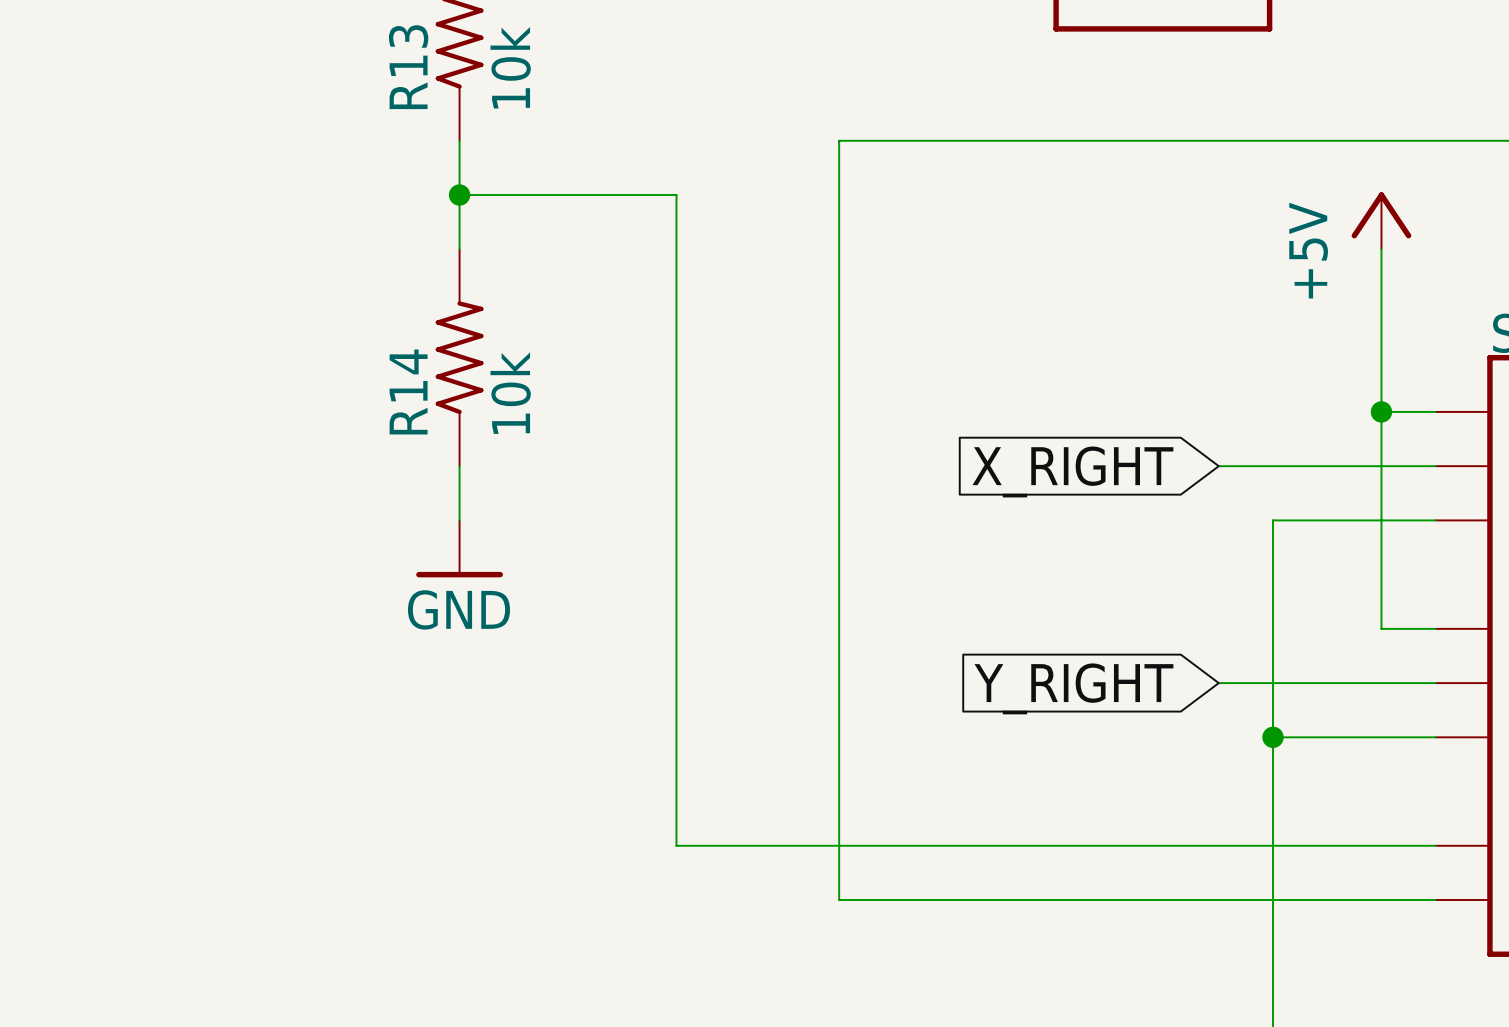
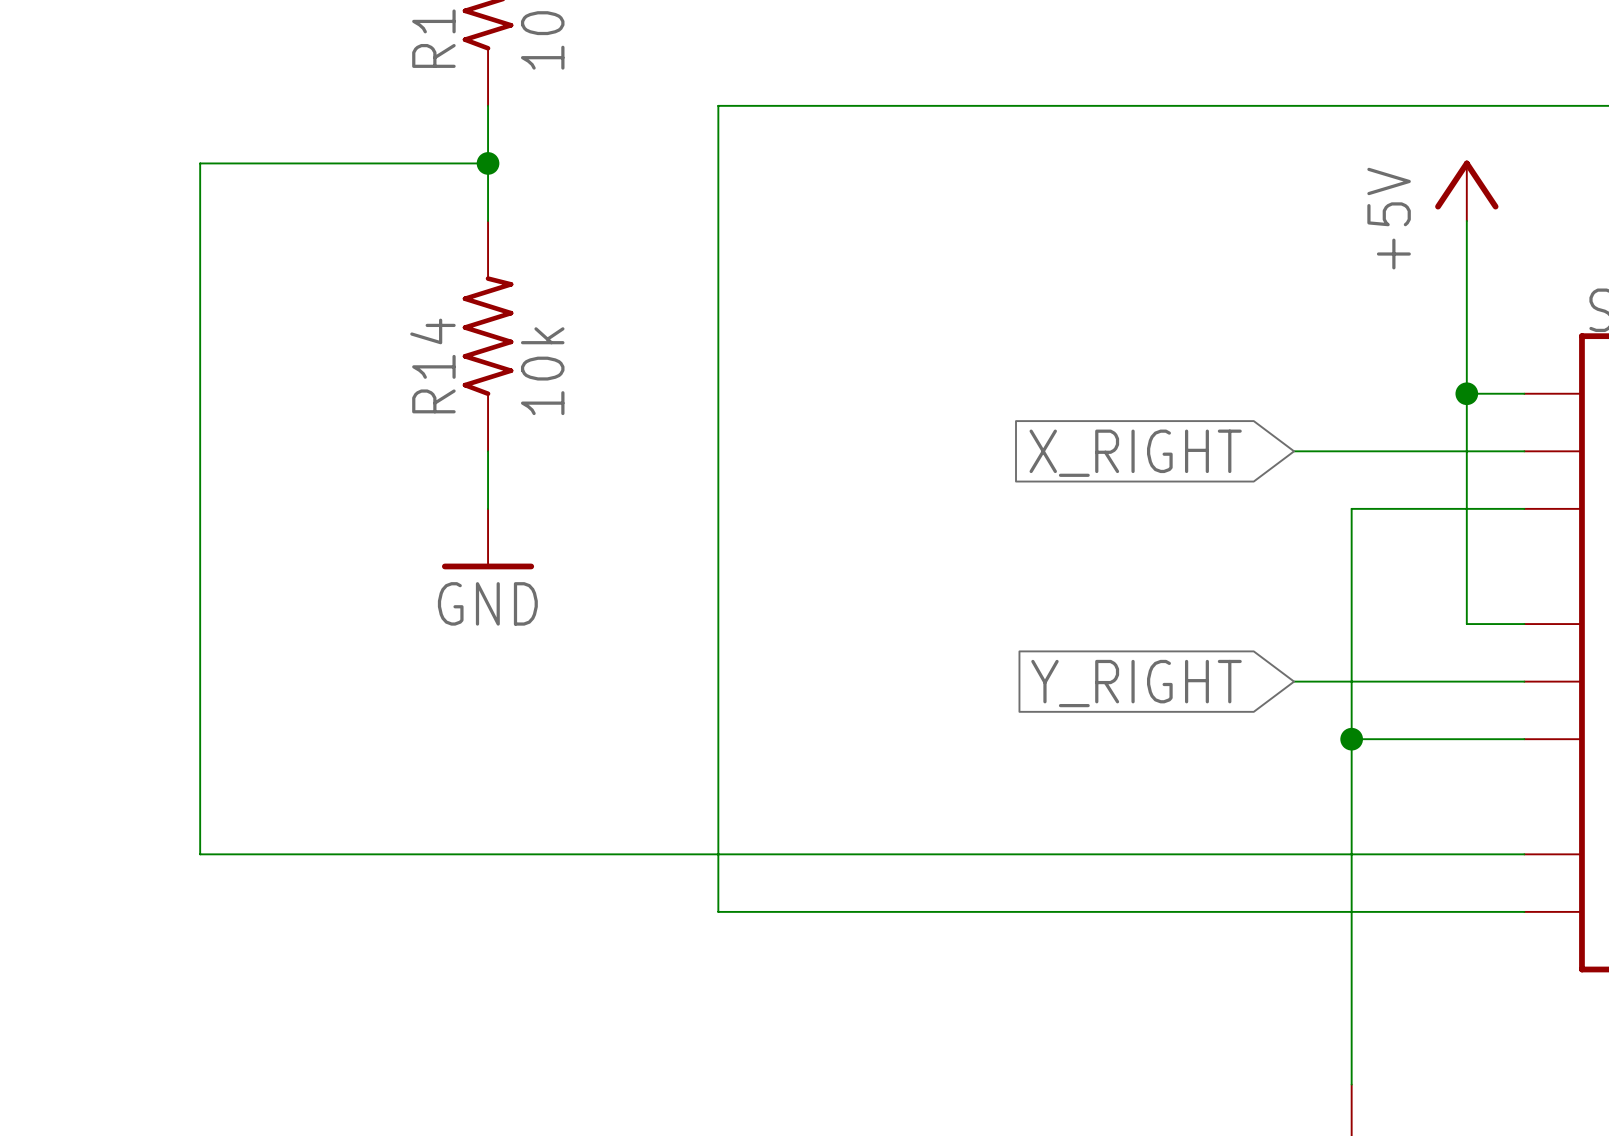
wire: (839, 140) (839, 900) -> (488, 163) (200, 163) (200, 854) (718, 854) (718, 911) (891, 911)
wire: (459, 195) (676, 195) -> (891, 105) (718, 105) (718, 163)

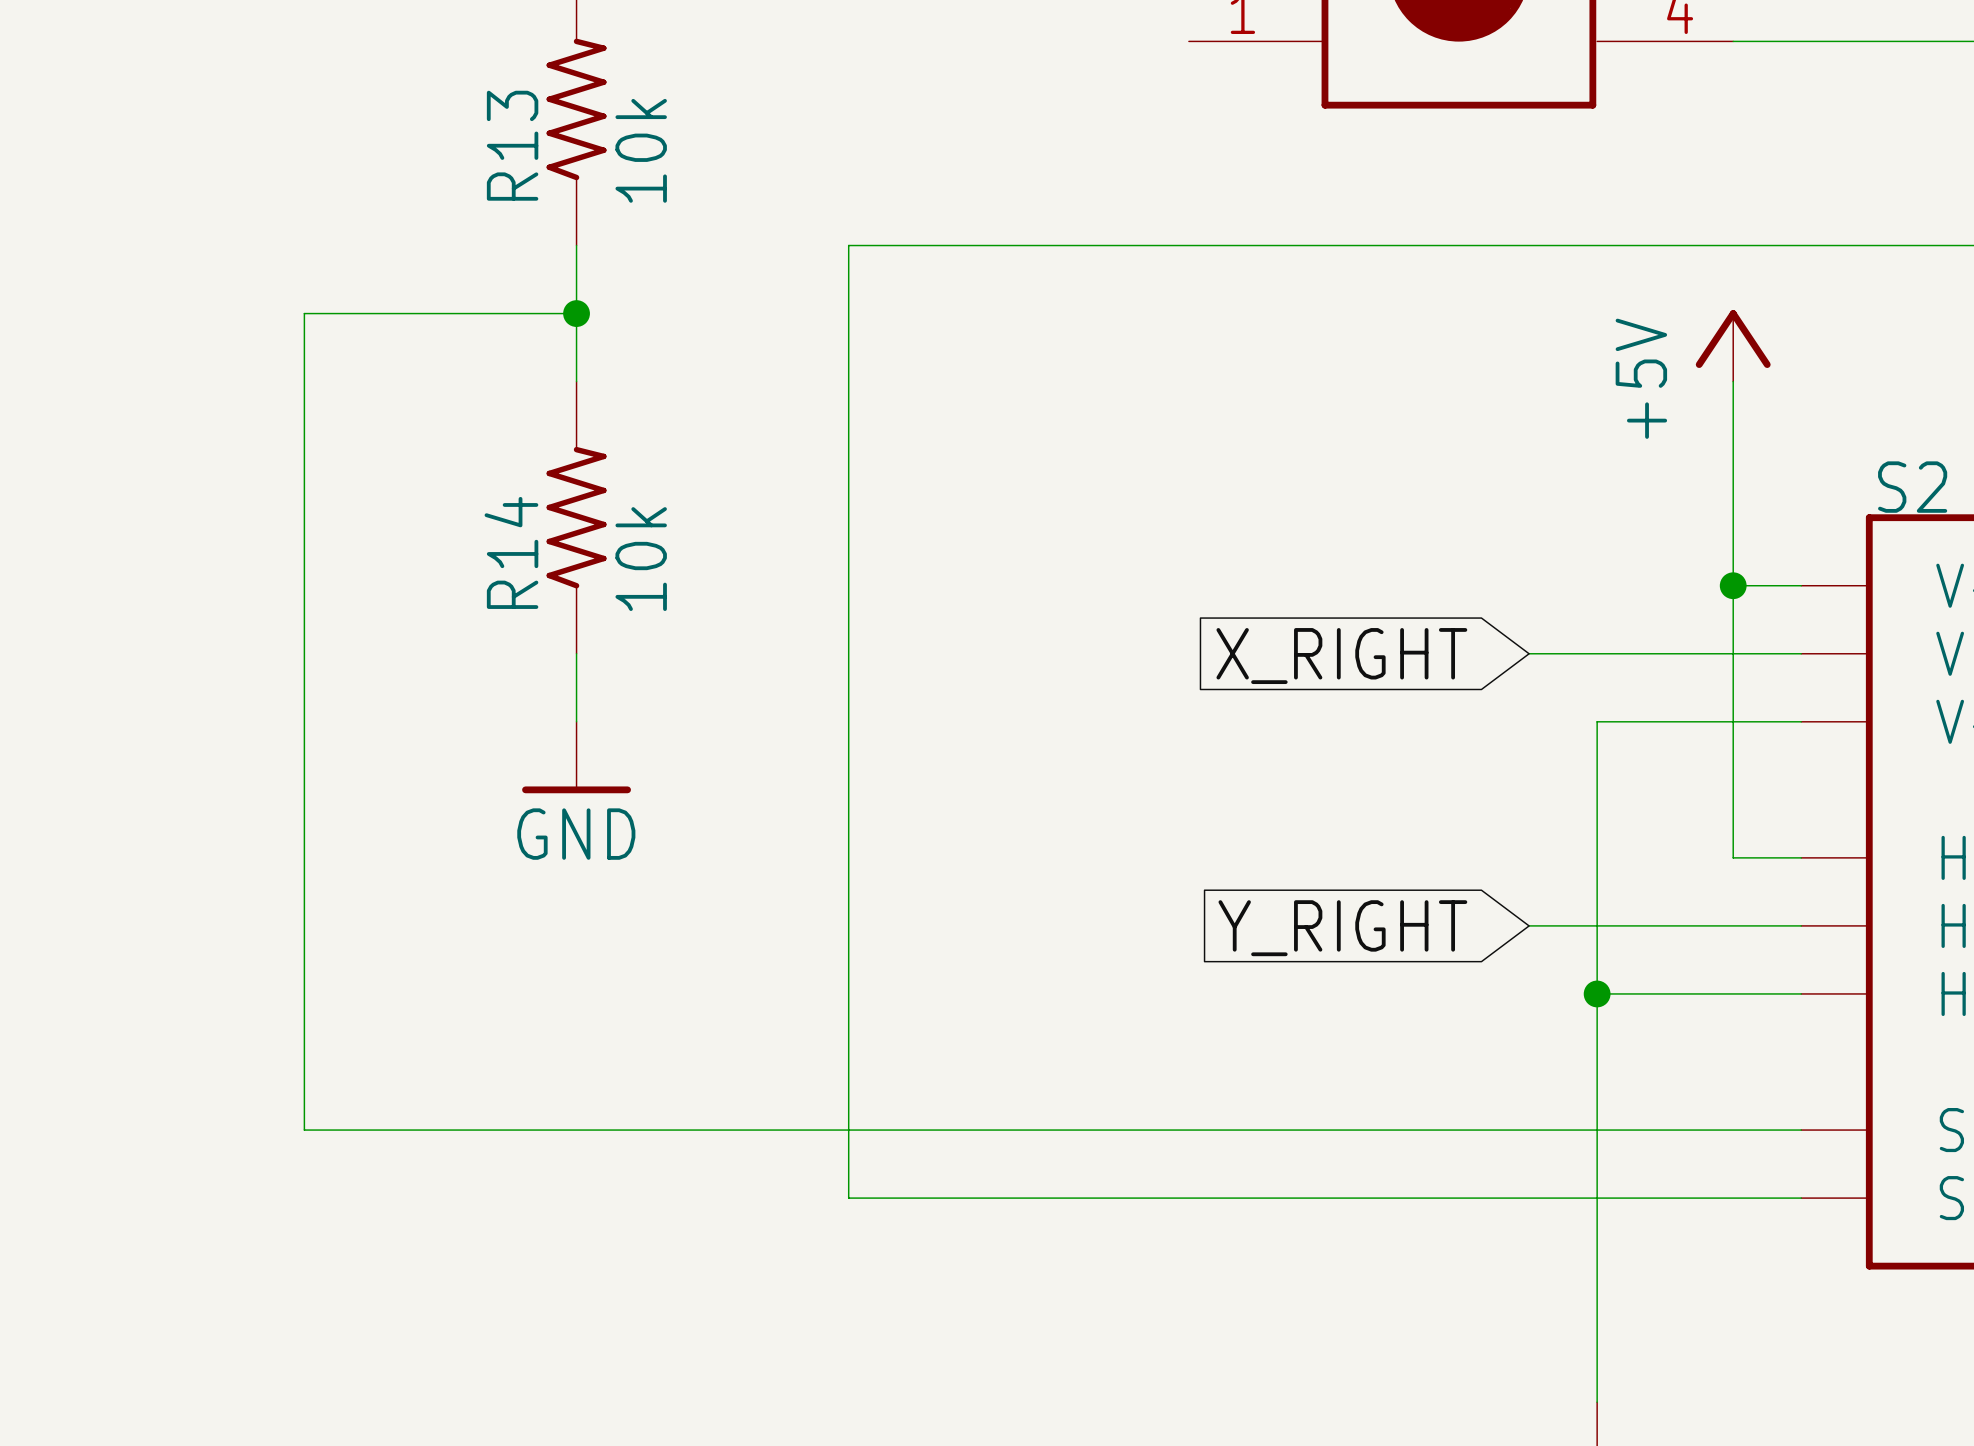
wire: (257, 163) (200, 163) (200, 854) (257, 854) -> (304, 313) (304, 1130)

